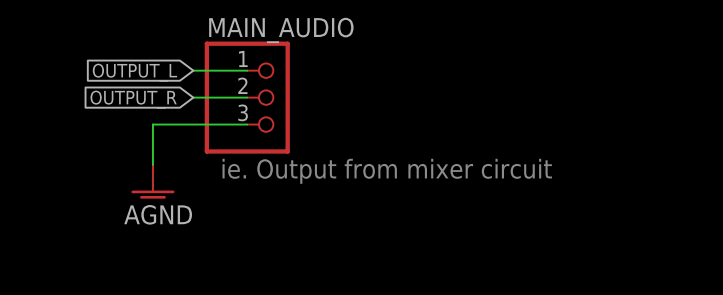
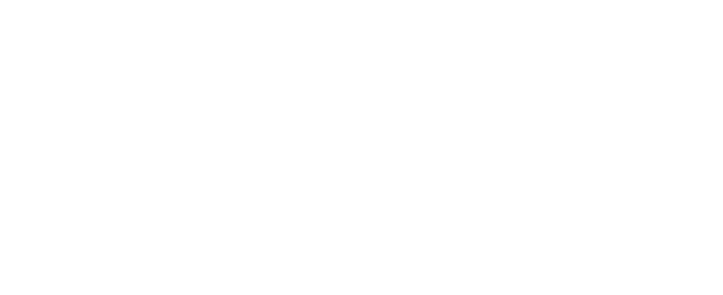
wire: (193, 70) (247, 70) -> none
global label: OUTPUT_L (134, 72) -> none
wire: (193, 97) (247, 97) -> none
MAIN_AUDIO: (247, 97) -> none
global label: OUTPUT_R (133, 99) -> none
wire: (247, 124) (152, 124) (152, 164) -> none
text: ie. Output from mixer circuit (387, 171) -> none
power symbol: AGND (152, 181) -> none

